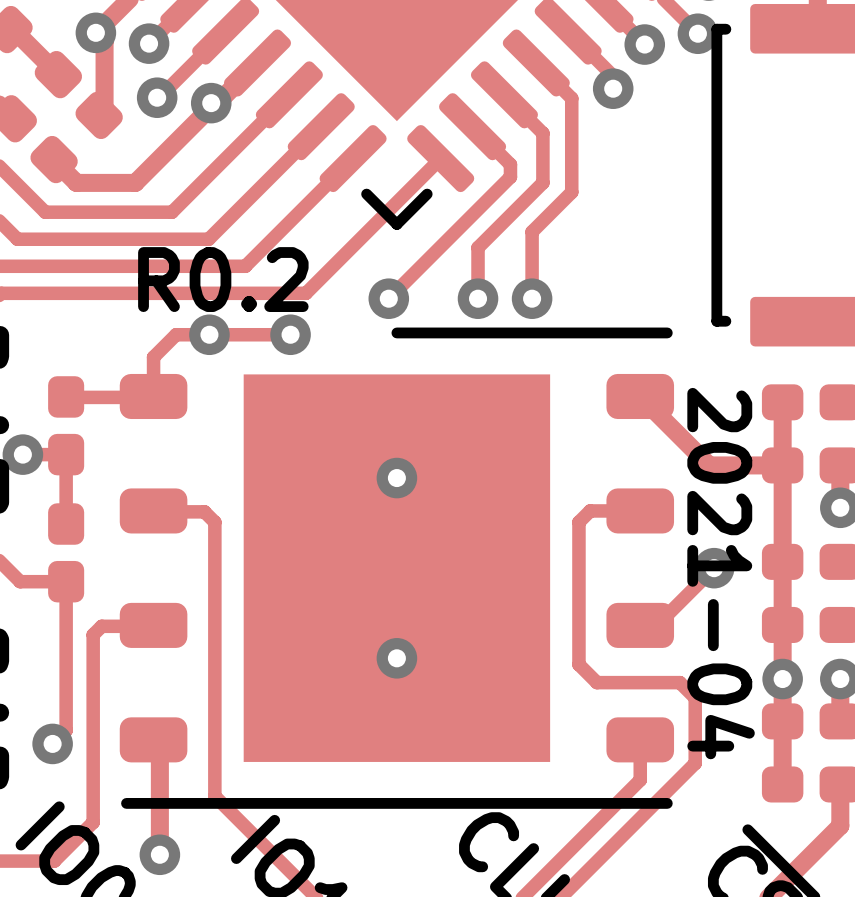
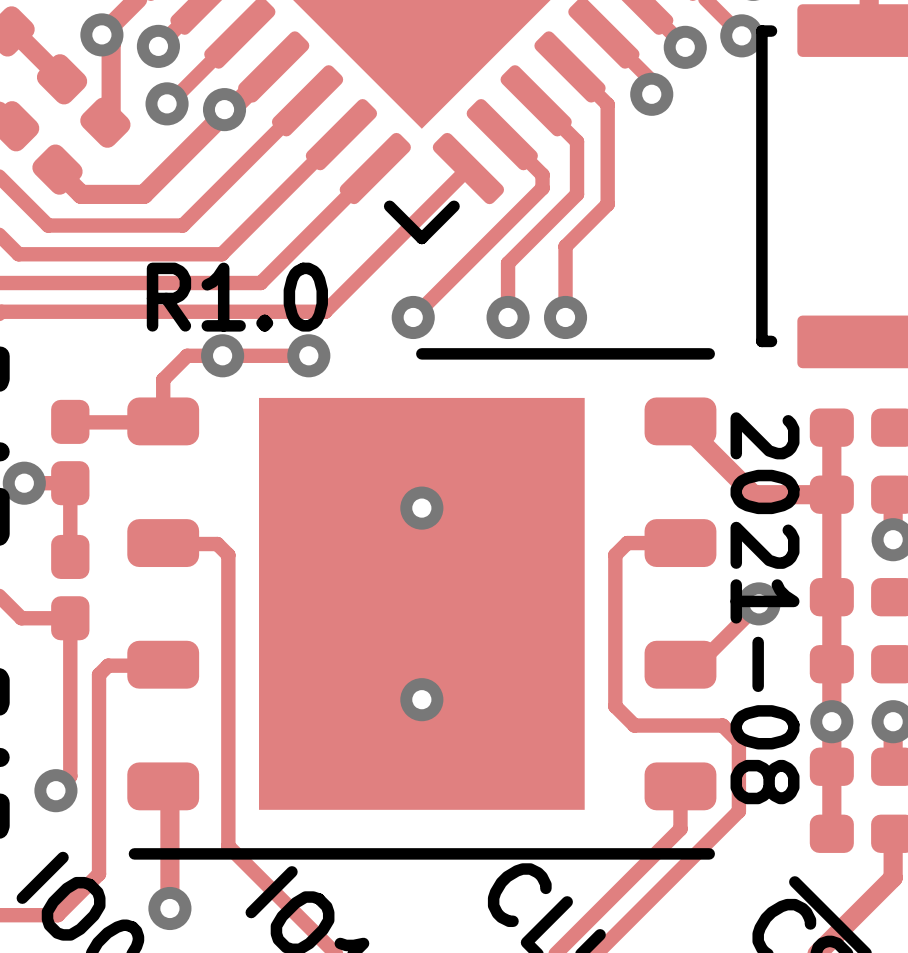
text: R0.2 (223, 279) -> R1.0 (237, 297)
text: 2021-04 (721, 573) -> 2021-08 (765, 608)

